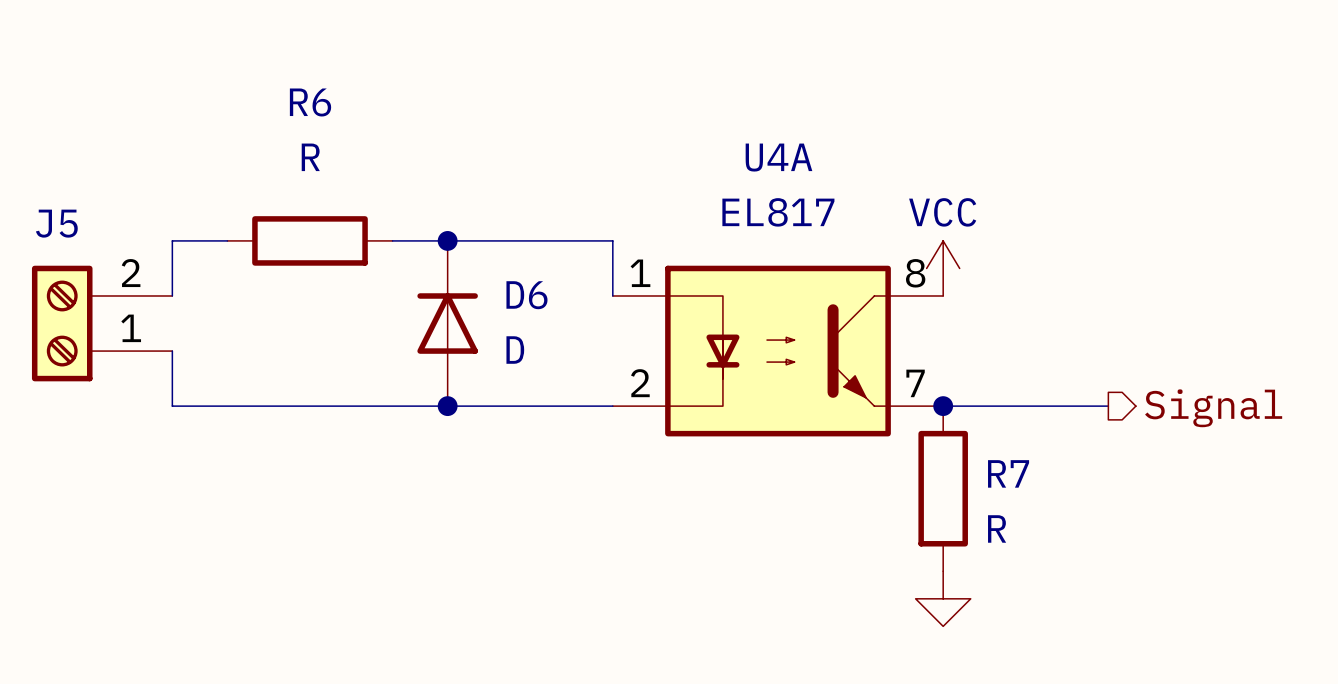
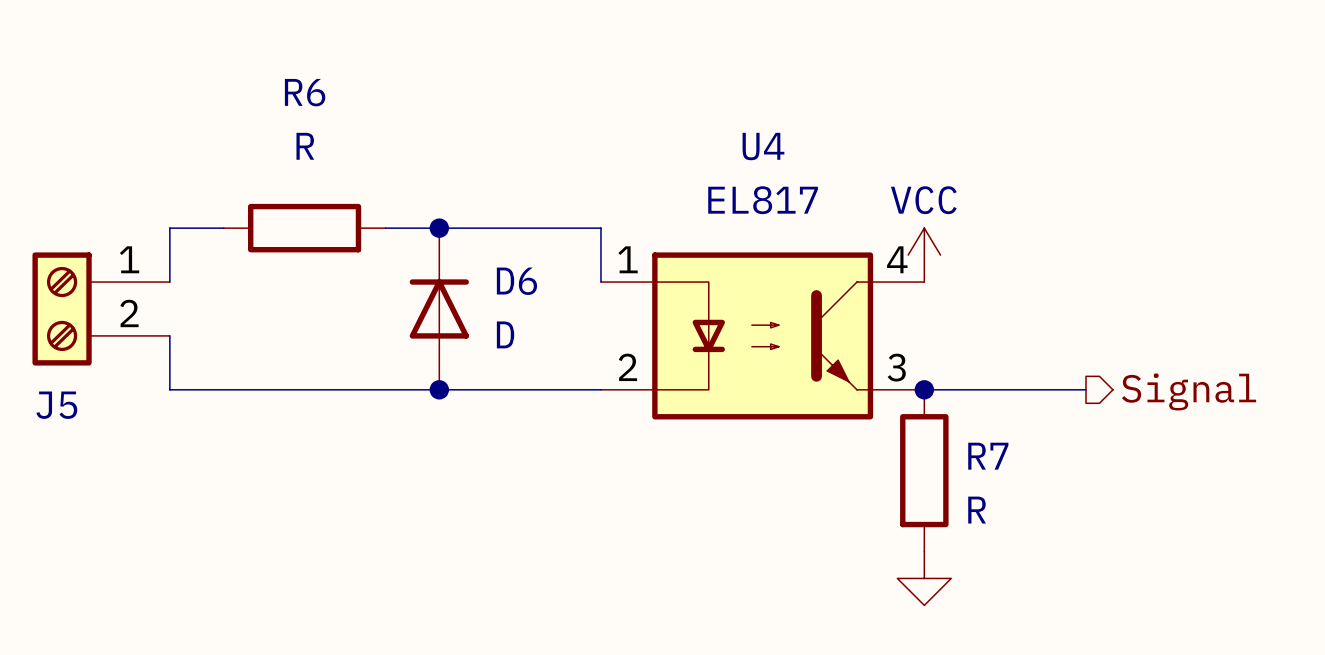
J5 flip: as is (62, 323) -> up-down (62, 308)
U4A: EL817 (778, 351) -> none
U4: none -> EL817 (762, 335)

